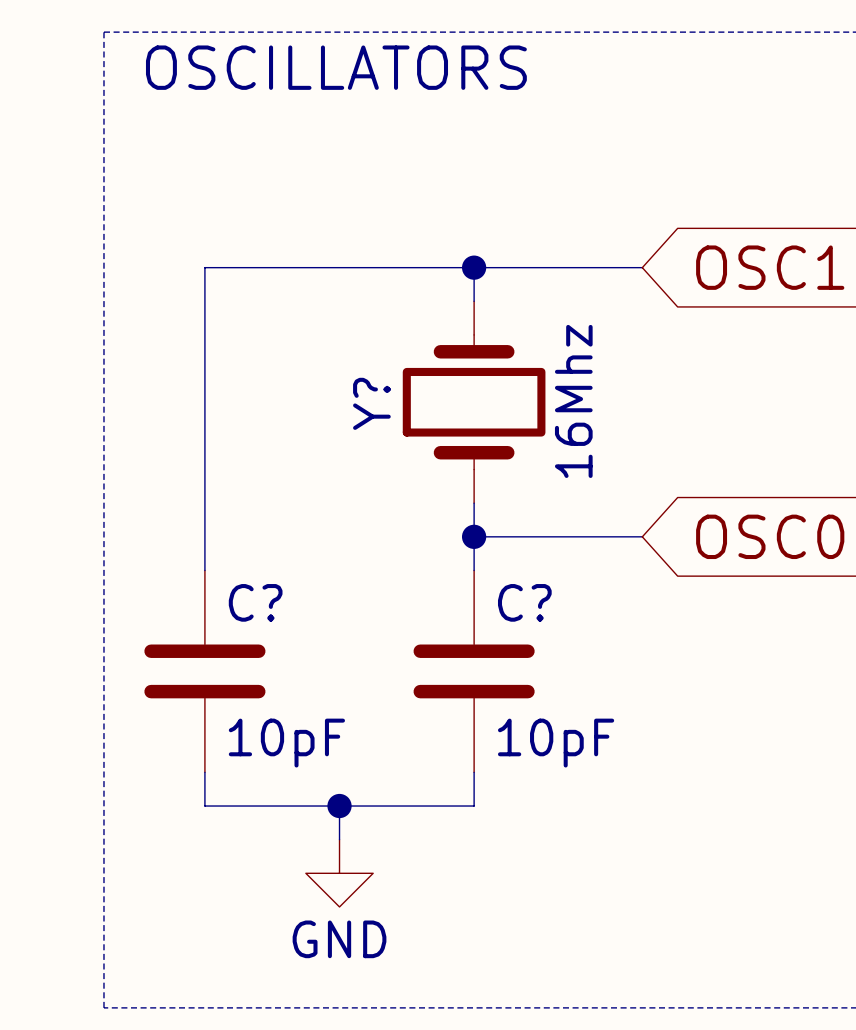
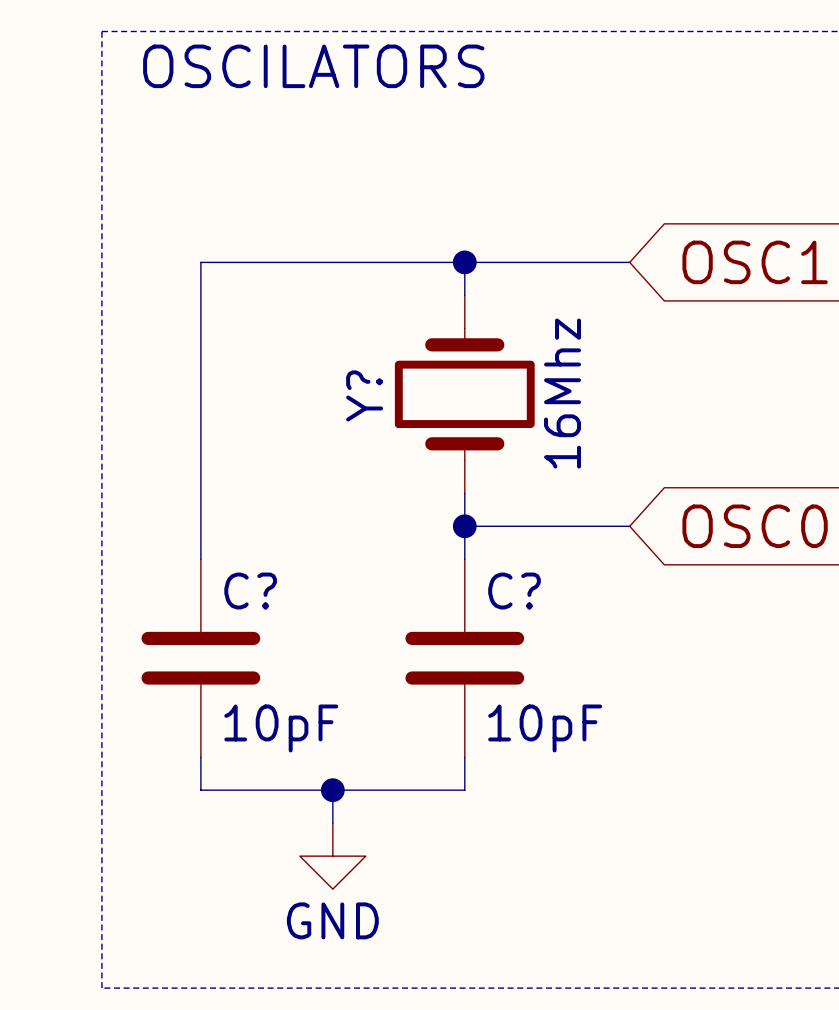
text: OSCILLATORS (336, 67) -> OSCILATORS (313, 66)

